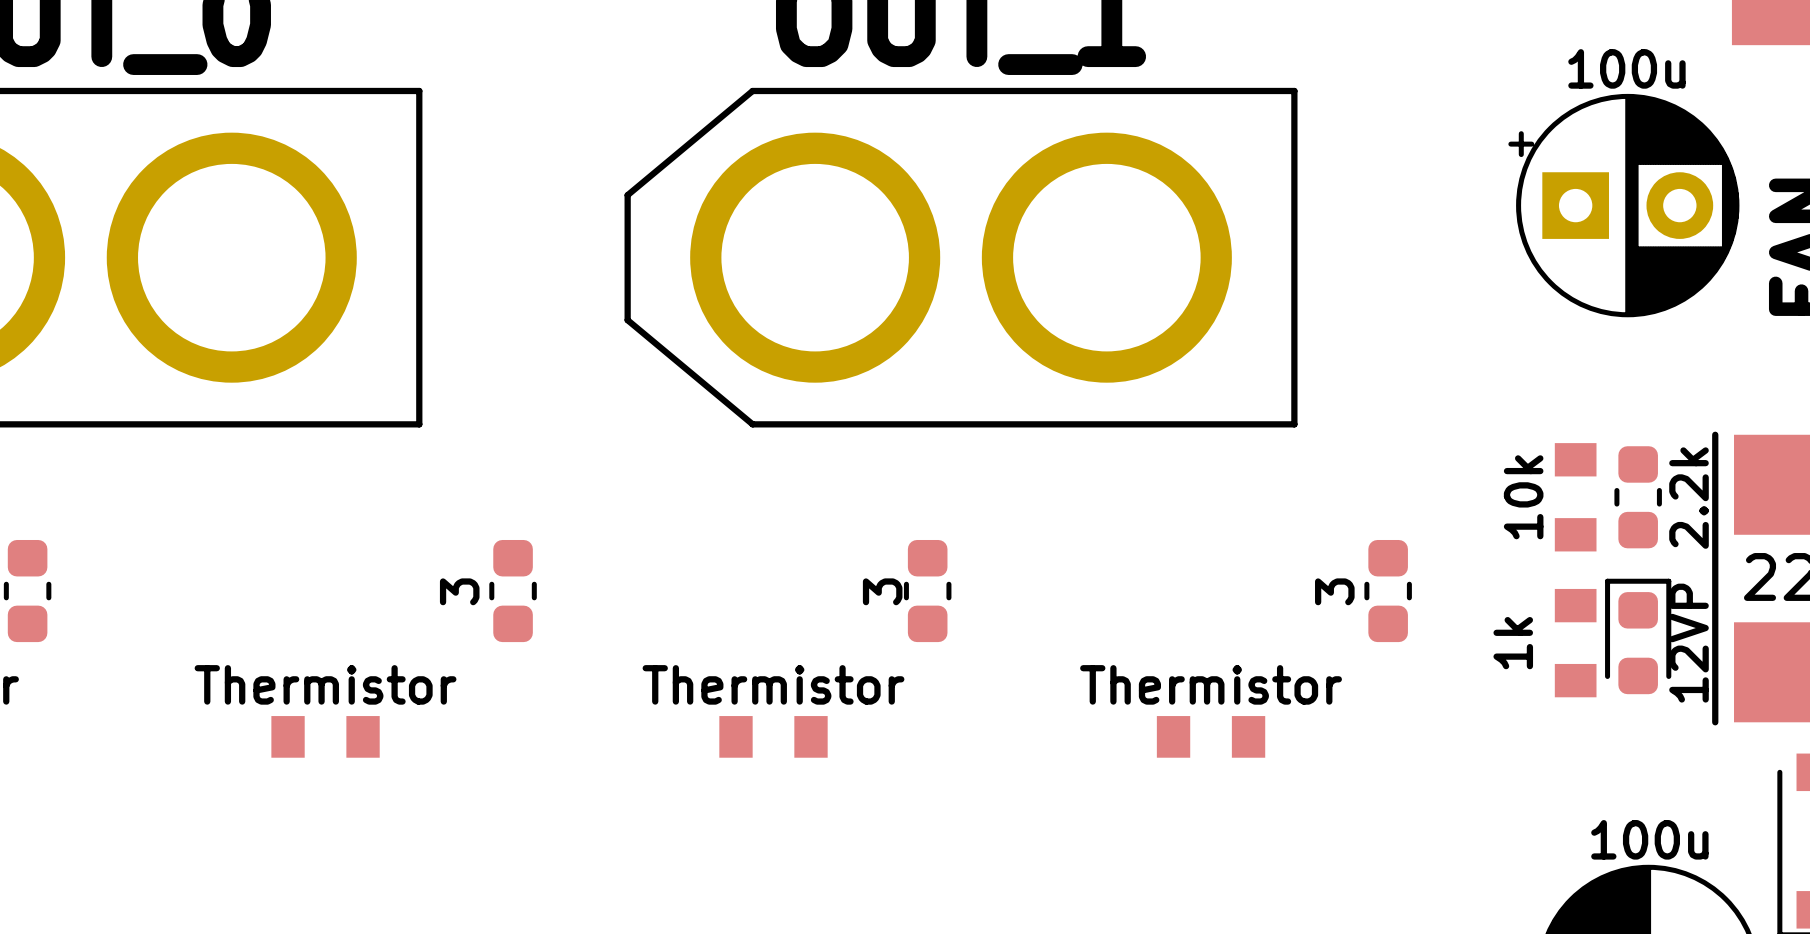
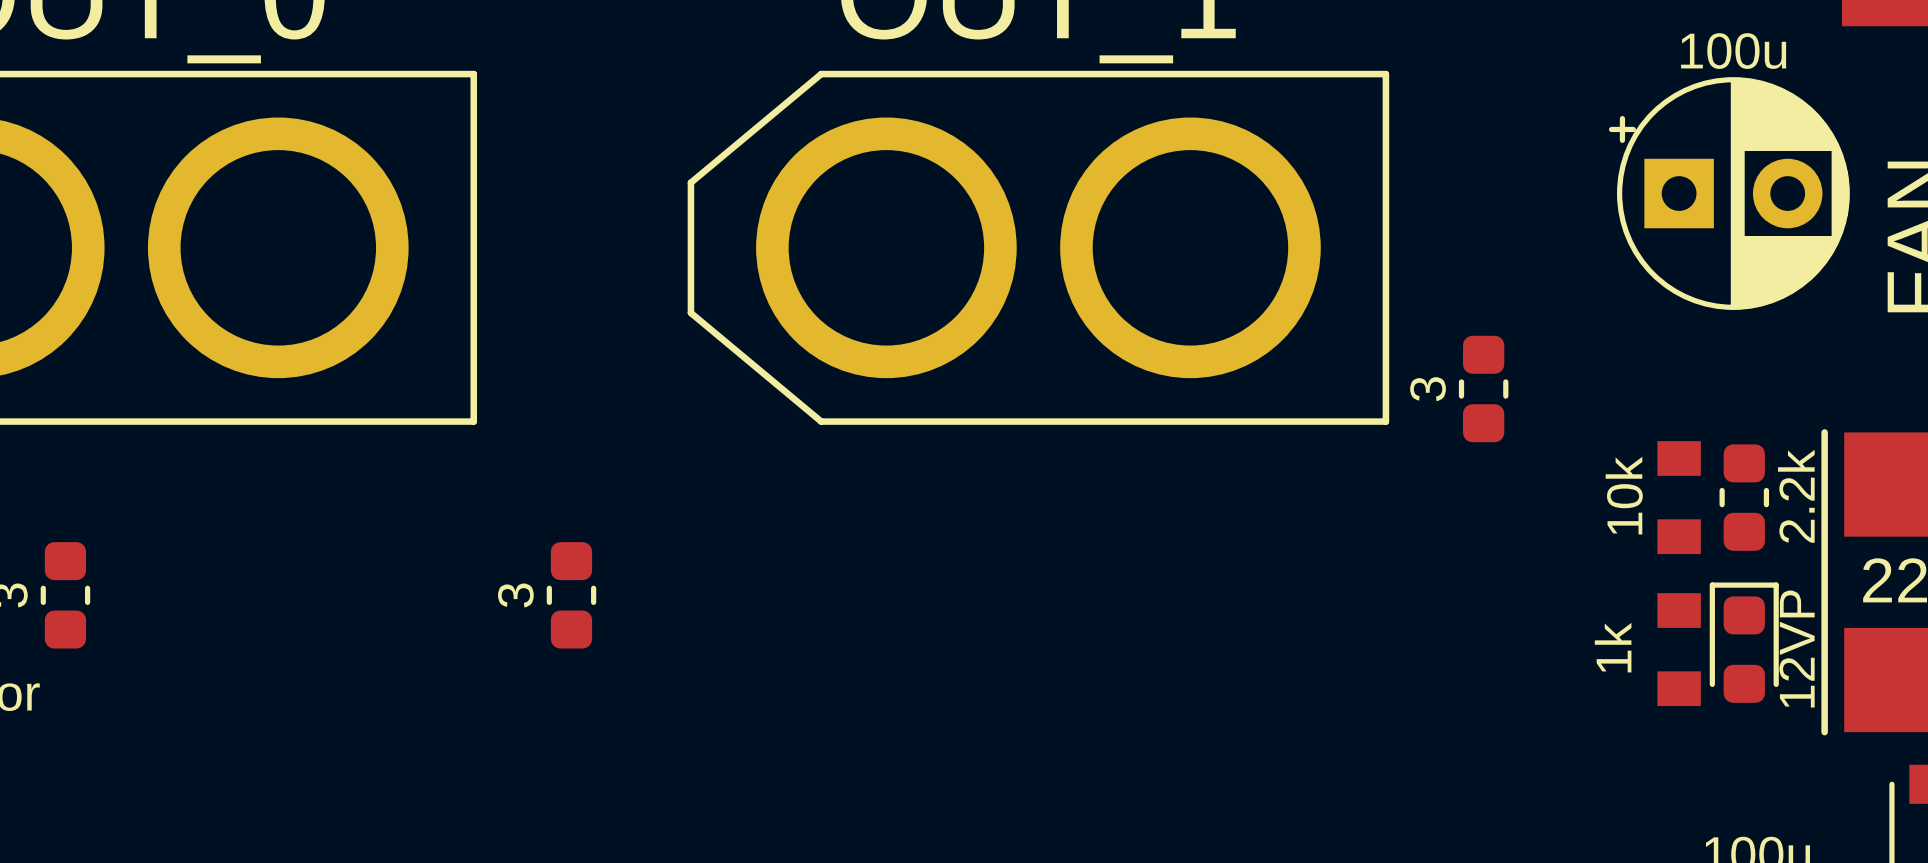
part: 3 (927, 591) -> none
part position: (1388, 591) -> (1483, 388)
part: Thermistor (325, 736) -> none
part: Thermistor (773, 736) -> none
part: Thermistor (1211, 736) -> none

